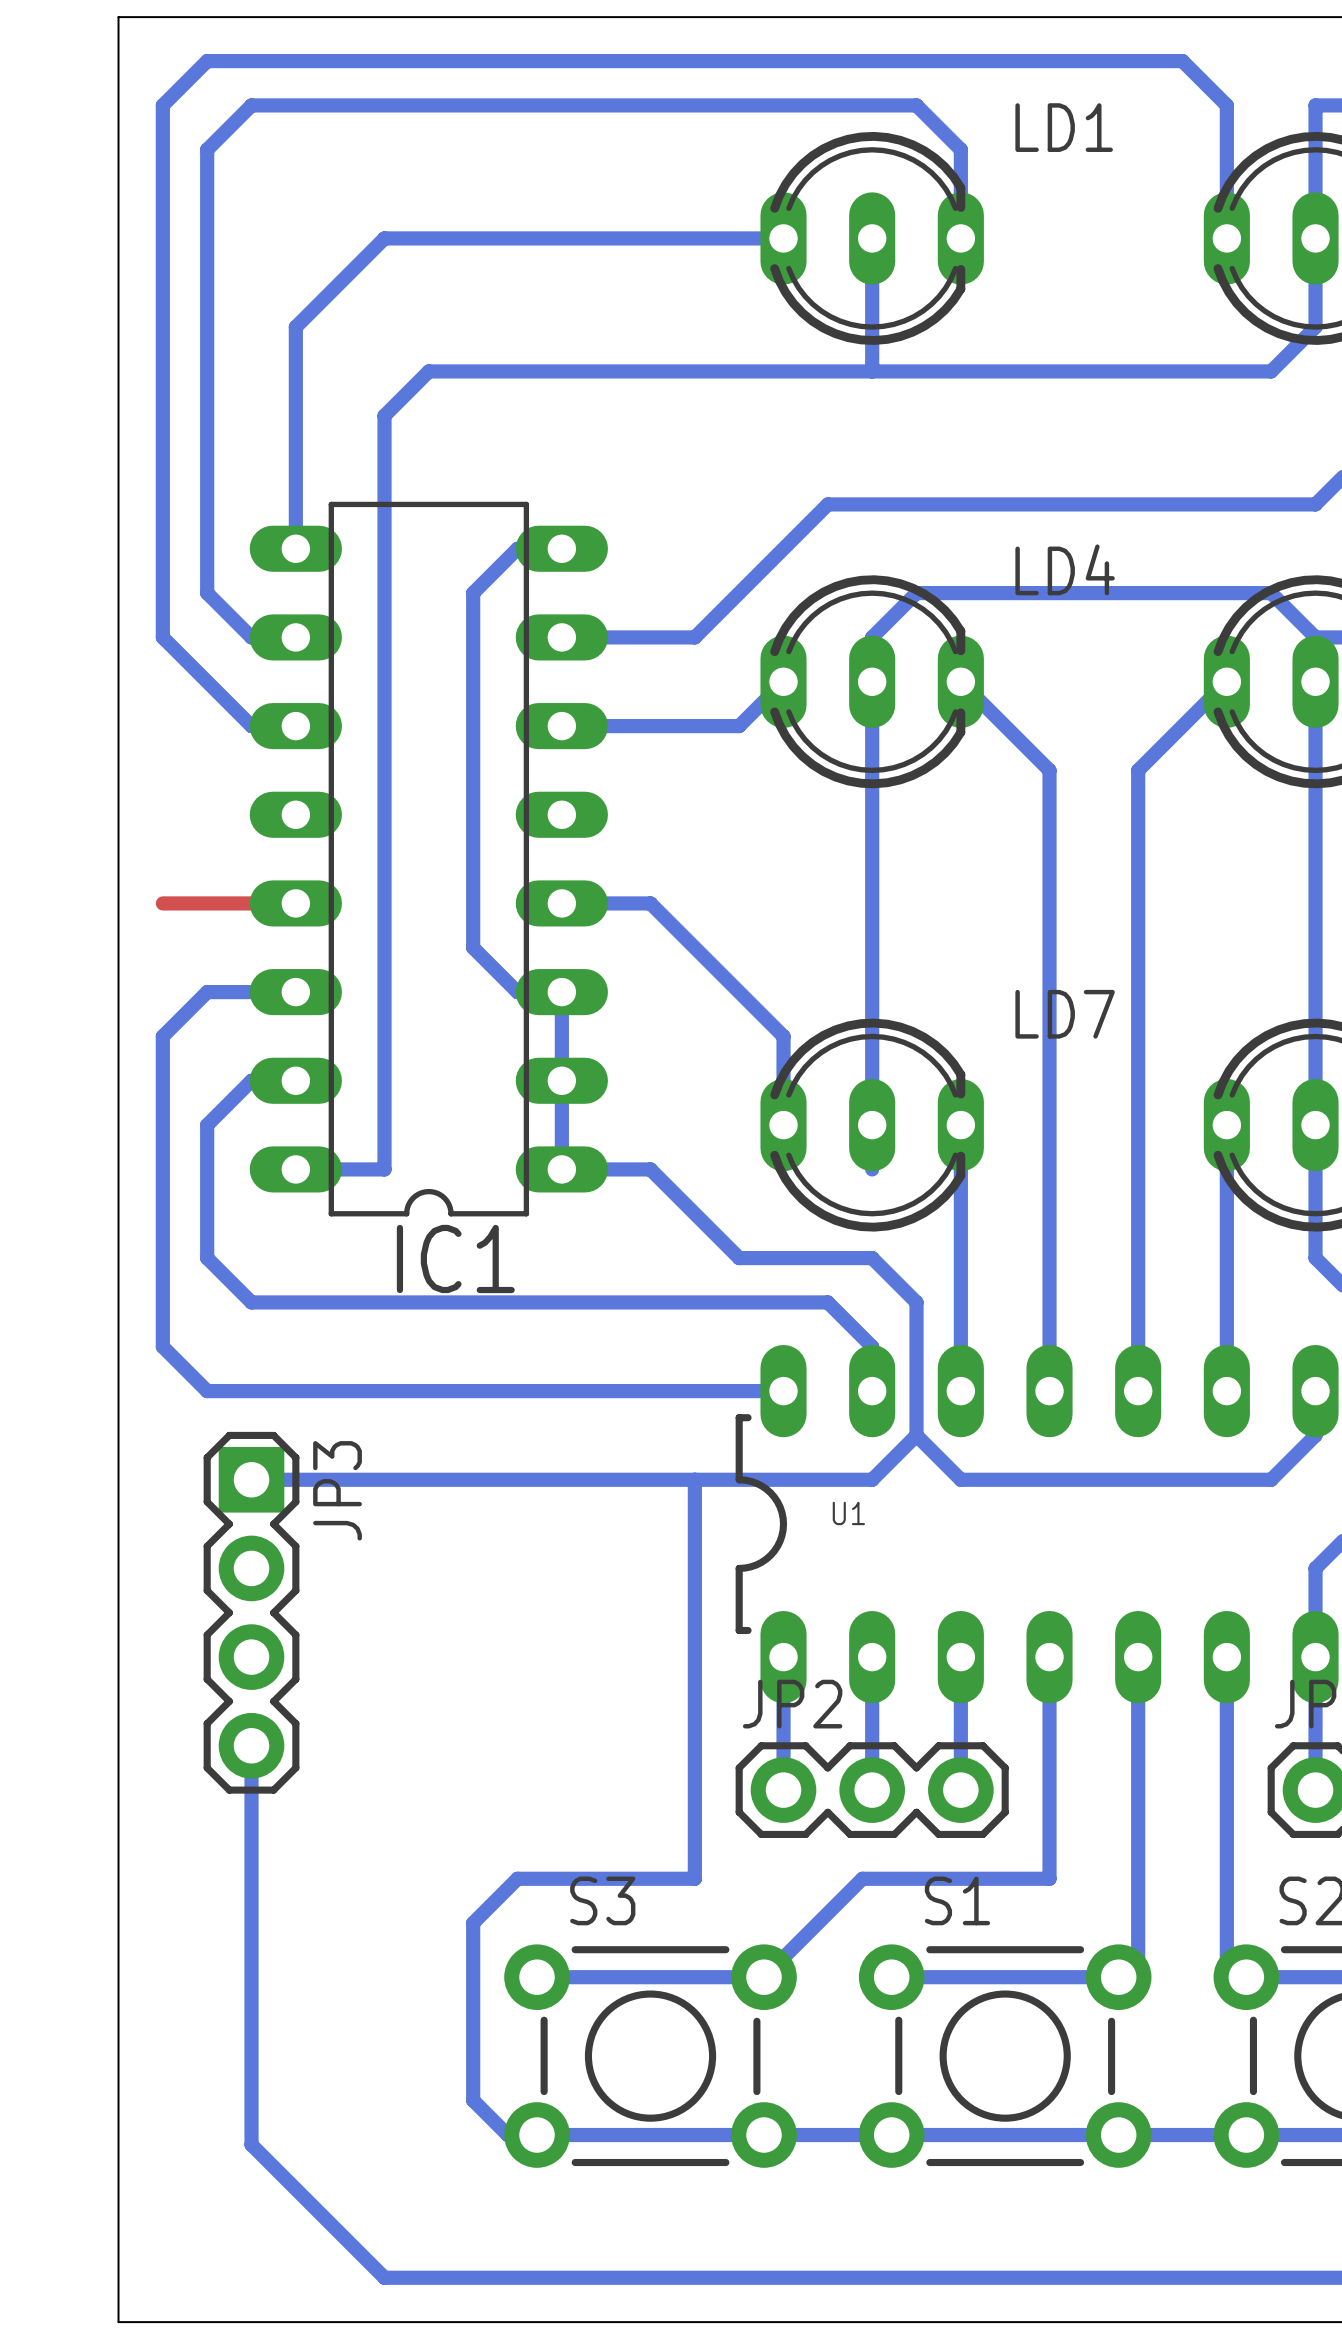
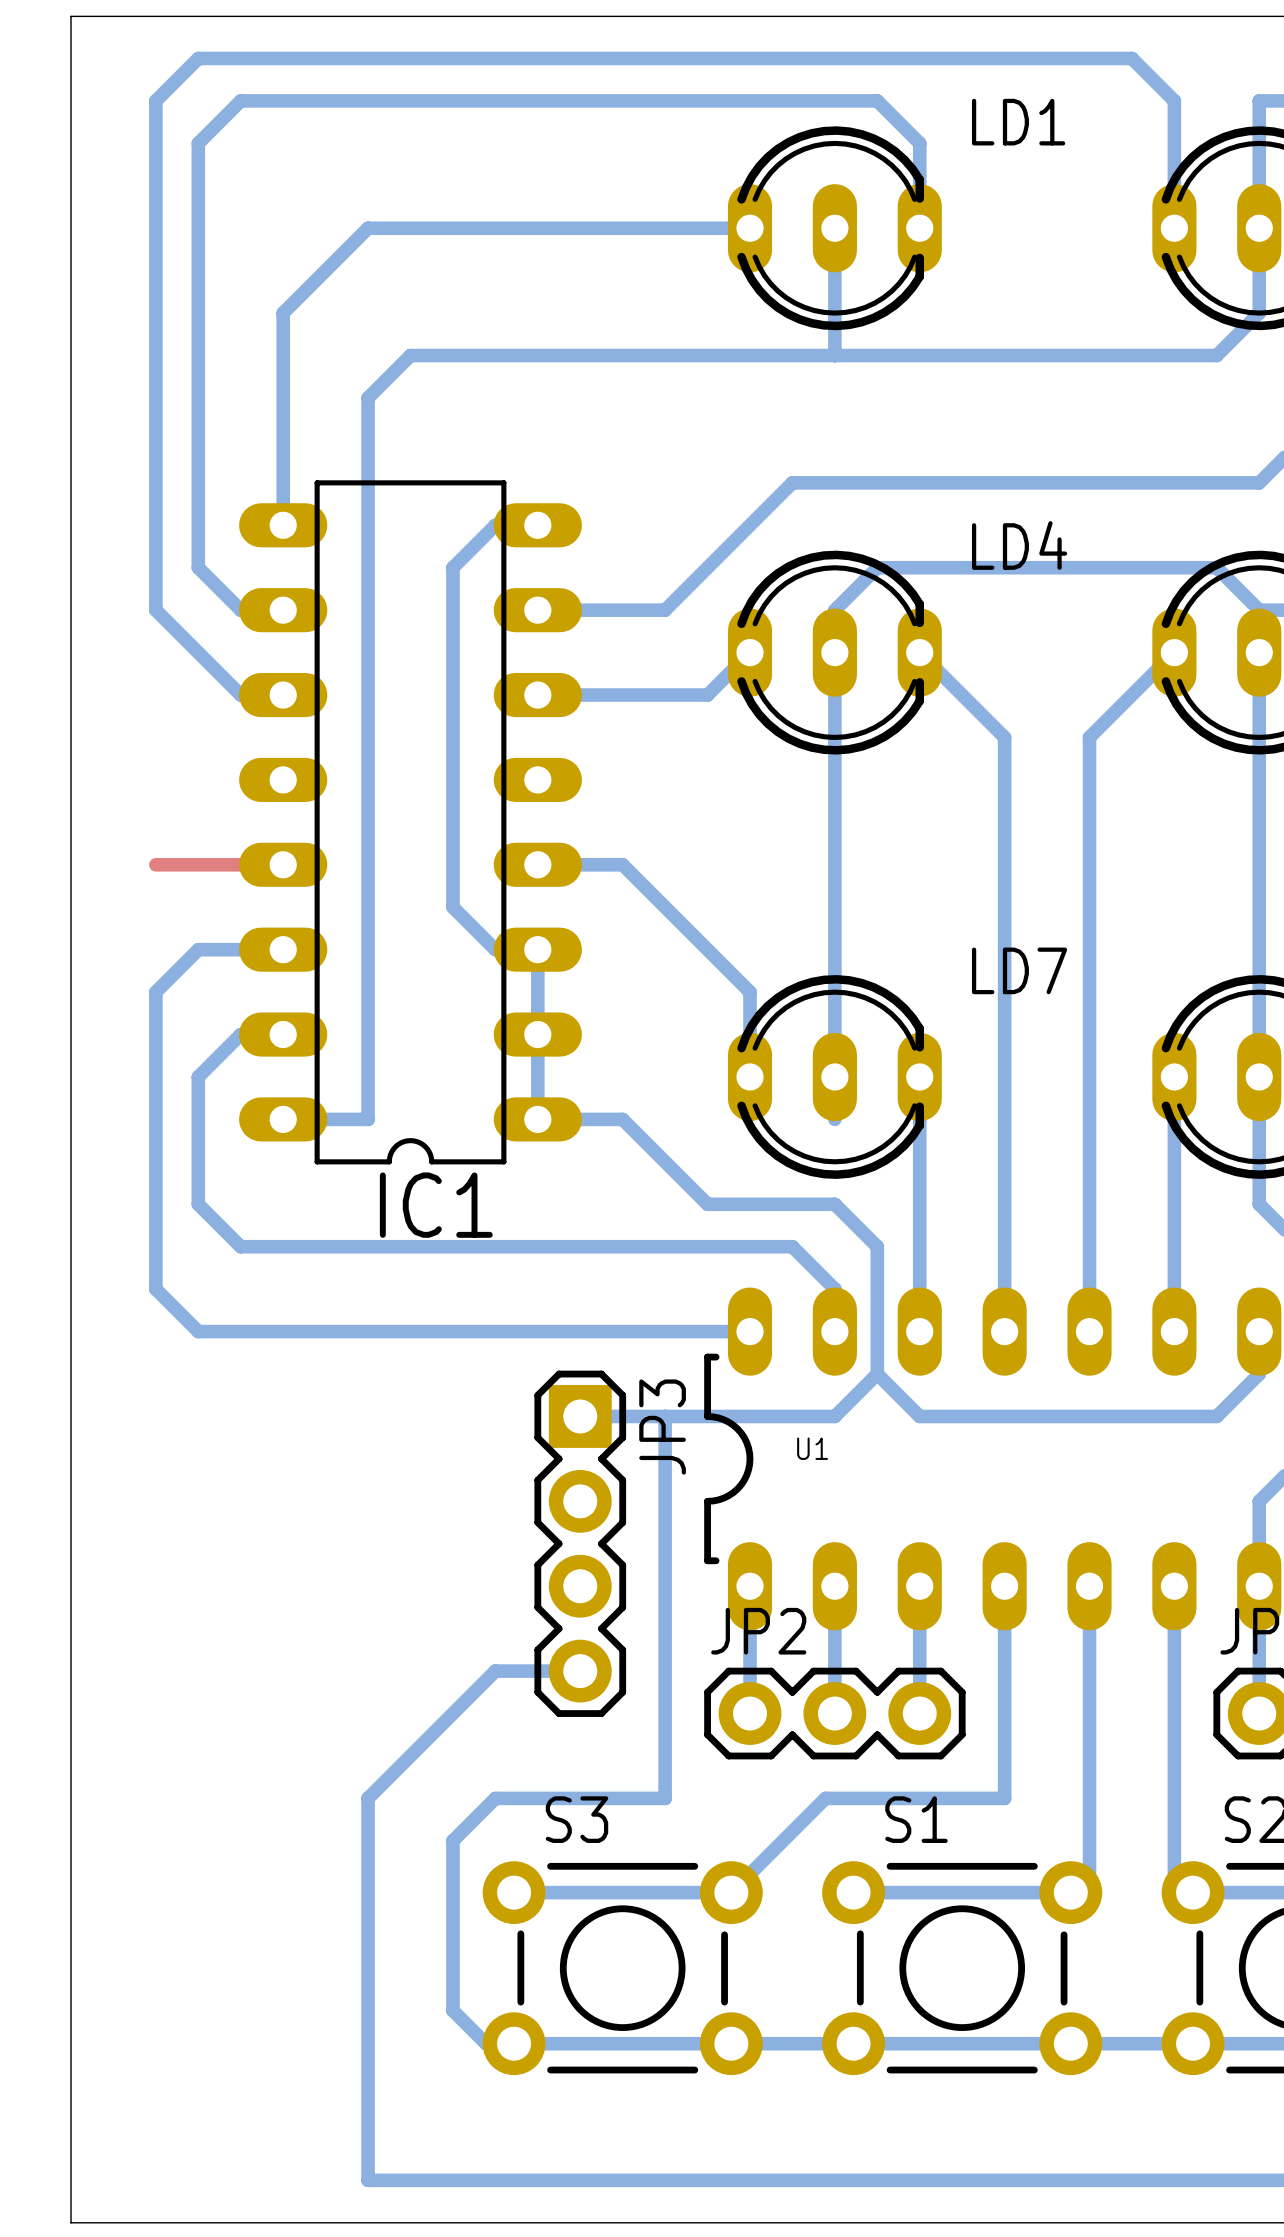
board edge: (118, 17) (118, 2322) -> (113, 16) (71, 16) (71, 2222) (113, 2222)
bottom track: (251, 1479) (606, 1479) -> none
JP3 position: (251, 1612) -> (580, 1543)
bottom track: (251, 1745) (251, 2144) (384, 2277) -> (580, 1671) (495, 1671) (368, 1798) (368, 2180)

